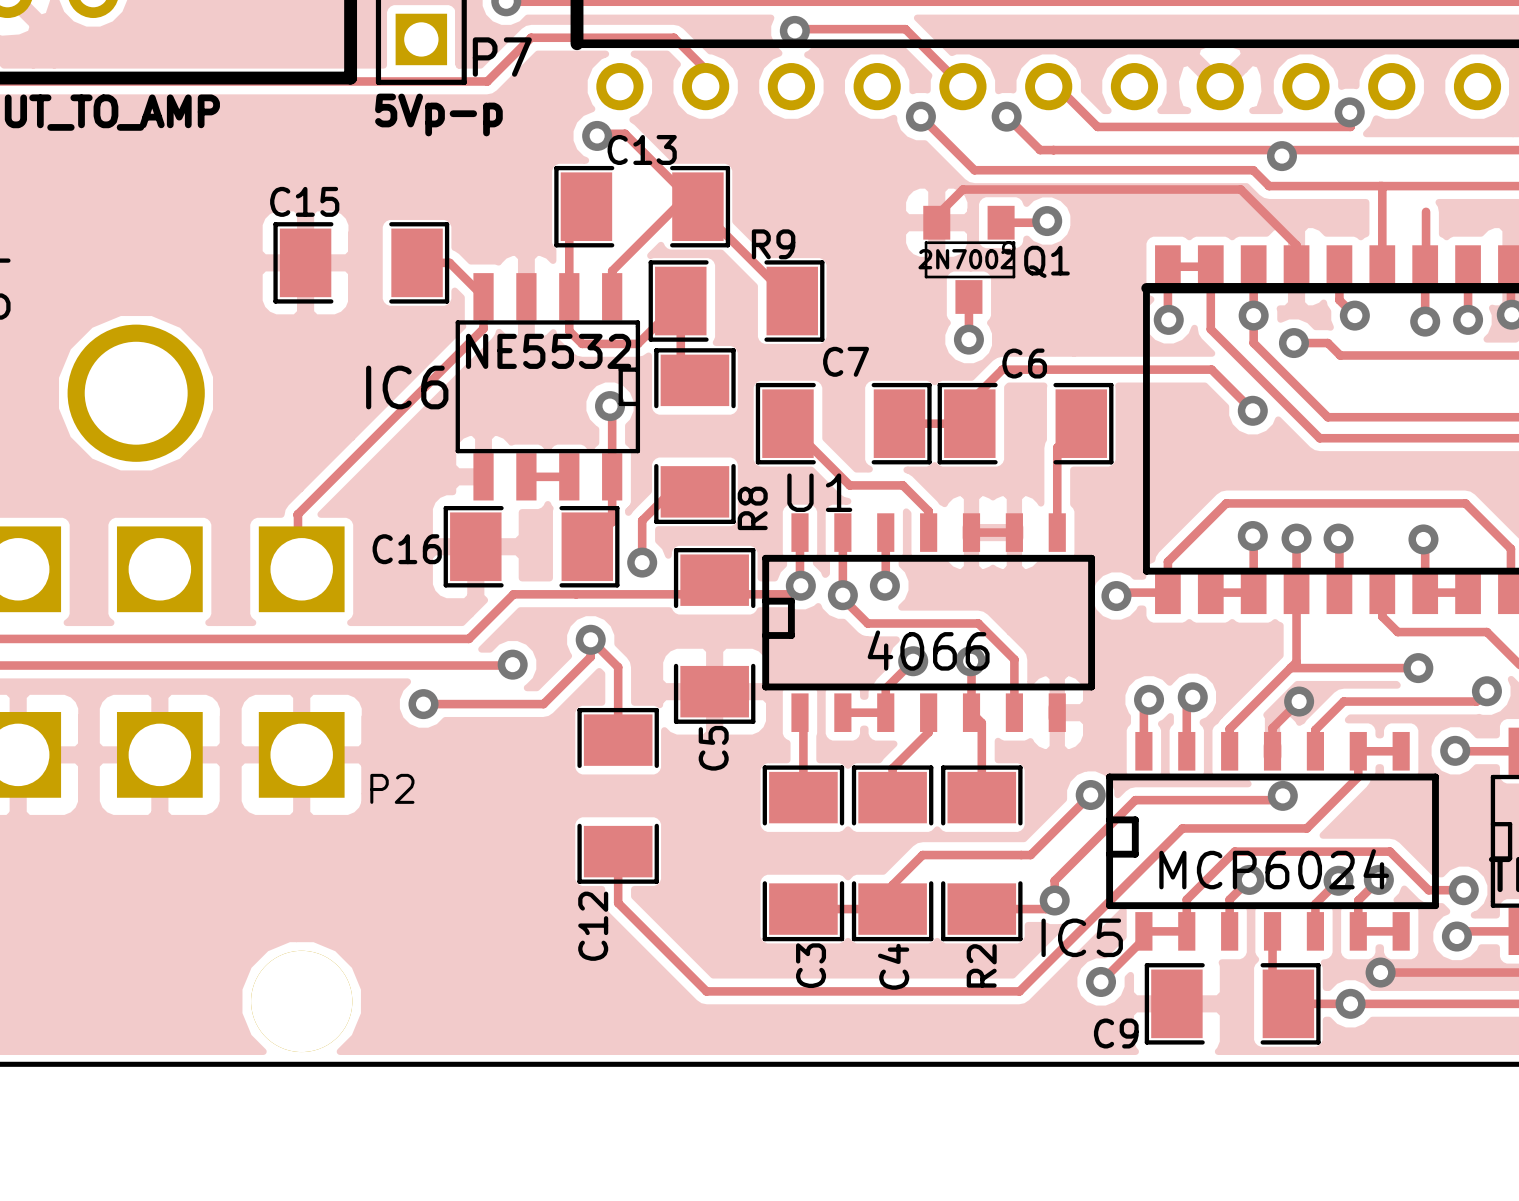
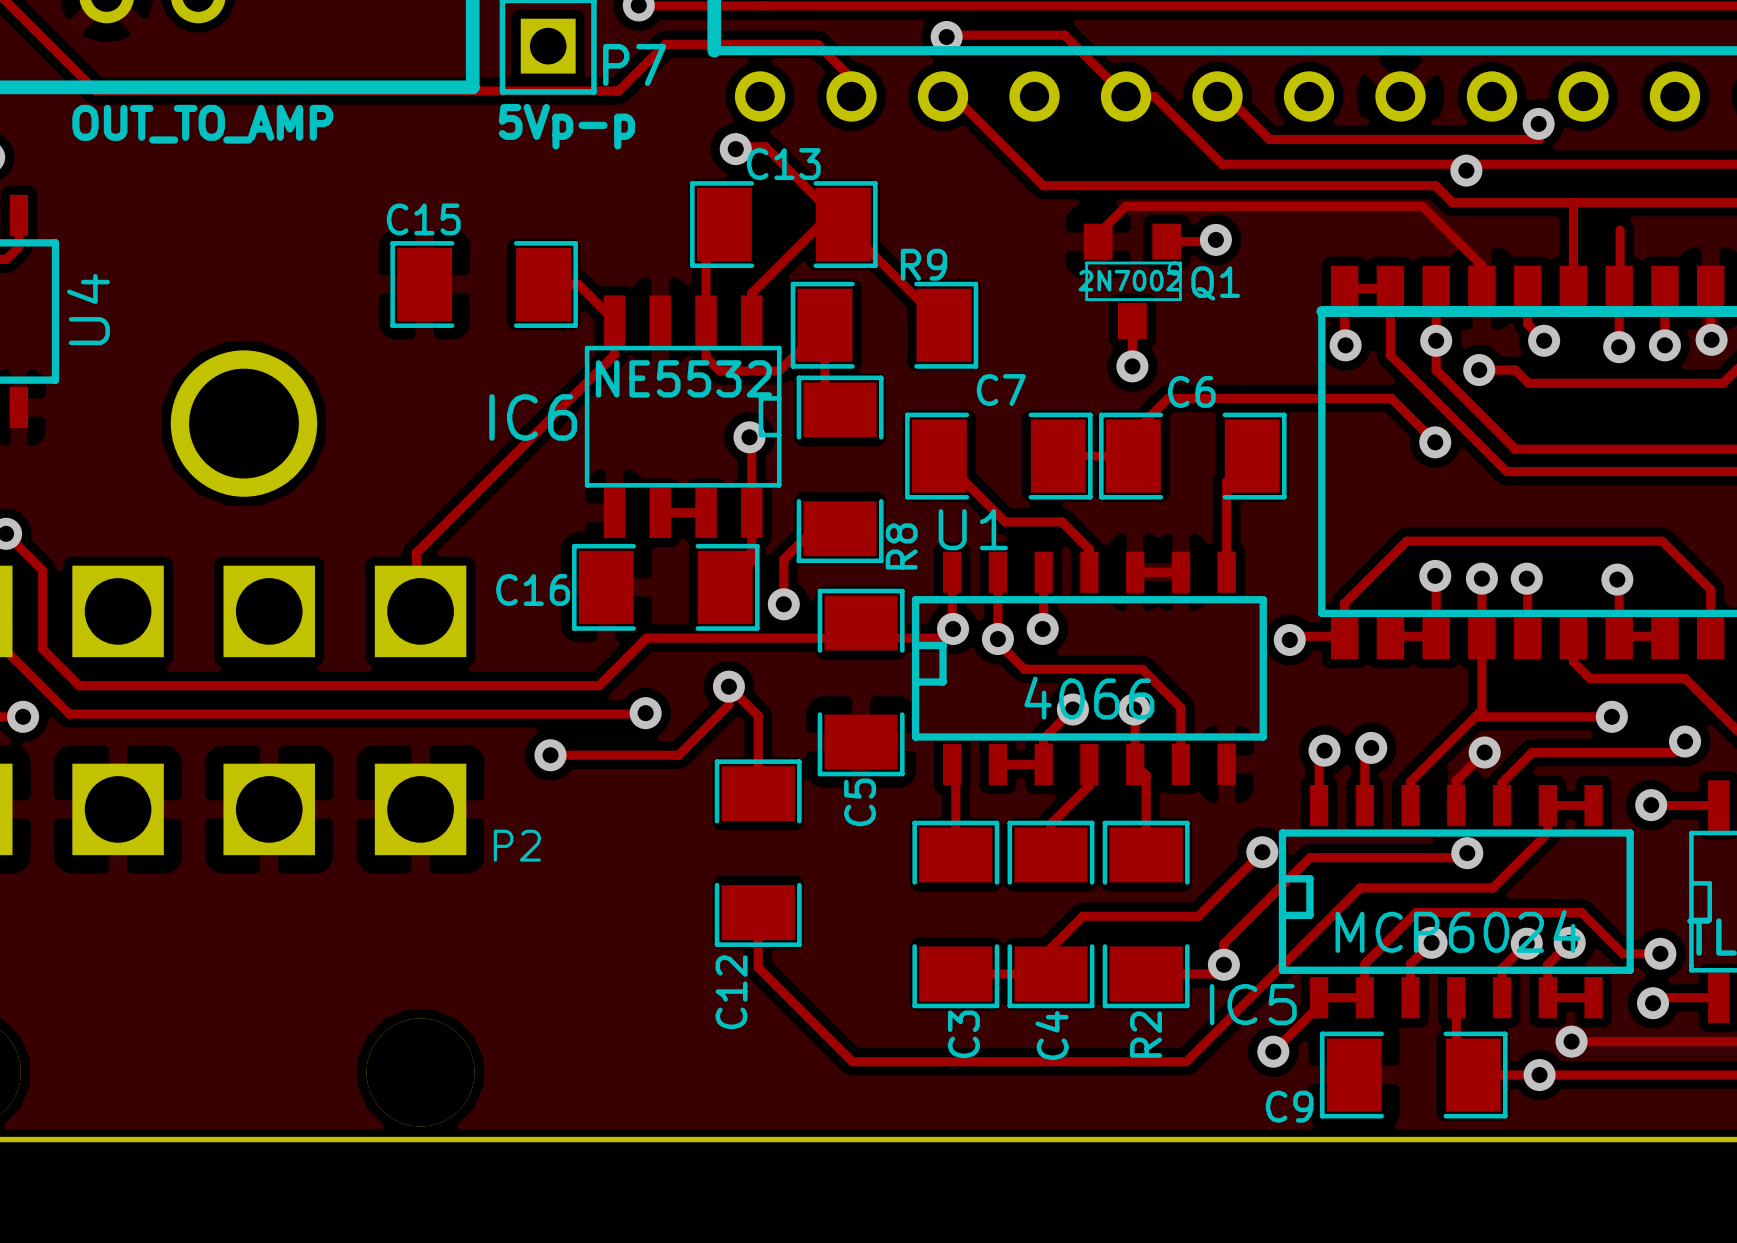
track: (920, 116) (974, 170) -> (953, 96) (1043, 185) (1138, 185)
via: (920, 116) -> none
track: (1006, 116) (1040, 150) (1052, 150) -> (1126, 96) (1154, 96) (1222, 164)
via: (1006, 116) -> none

